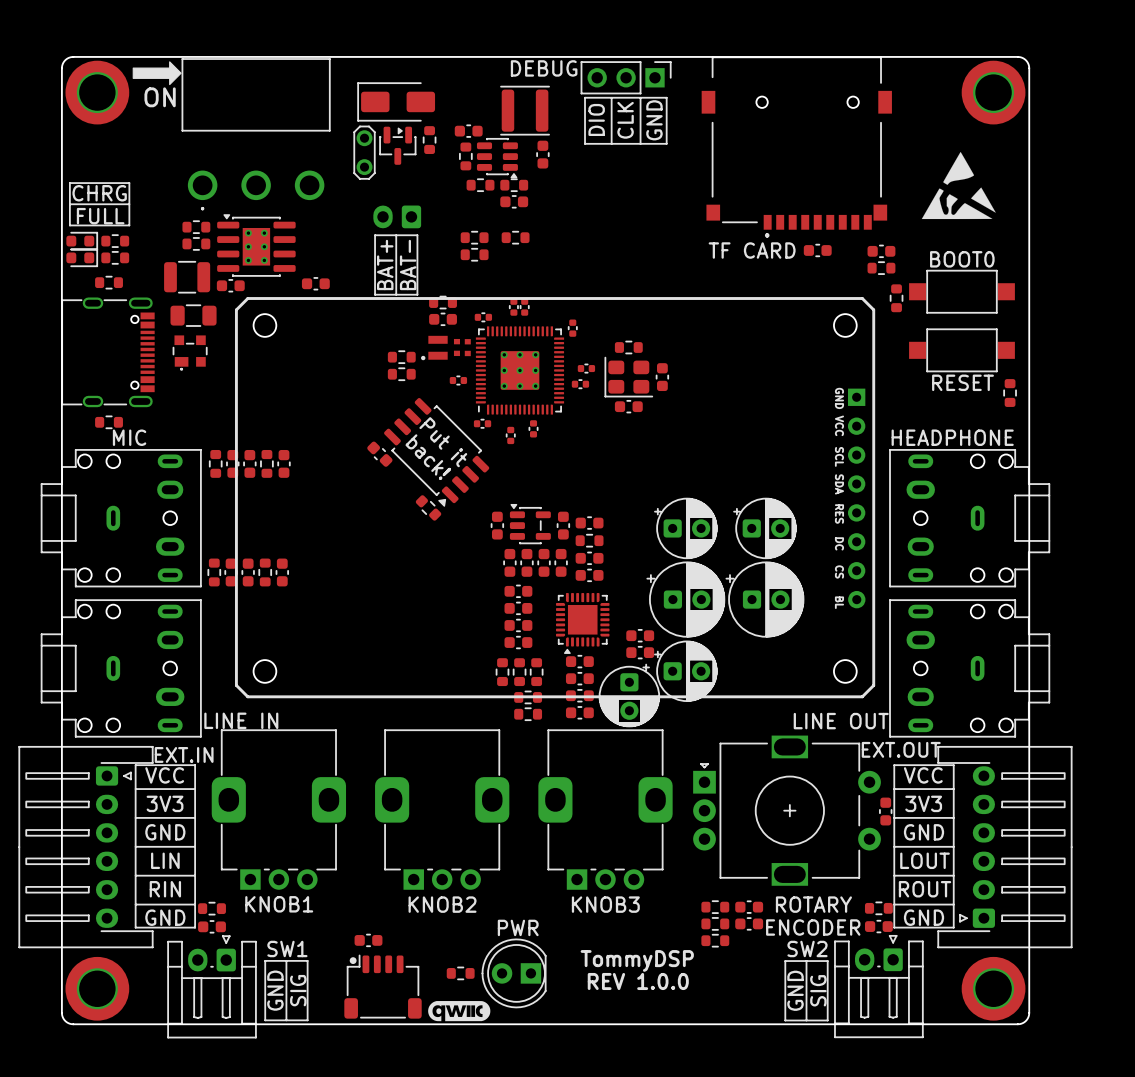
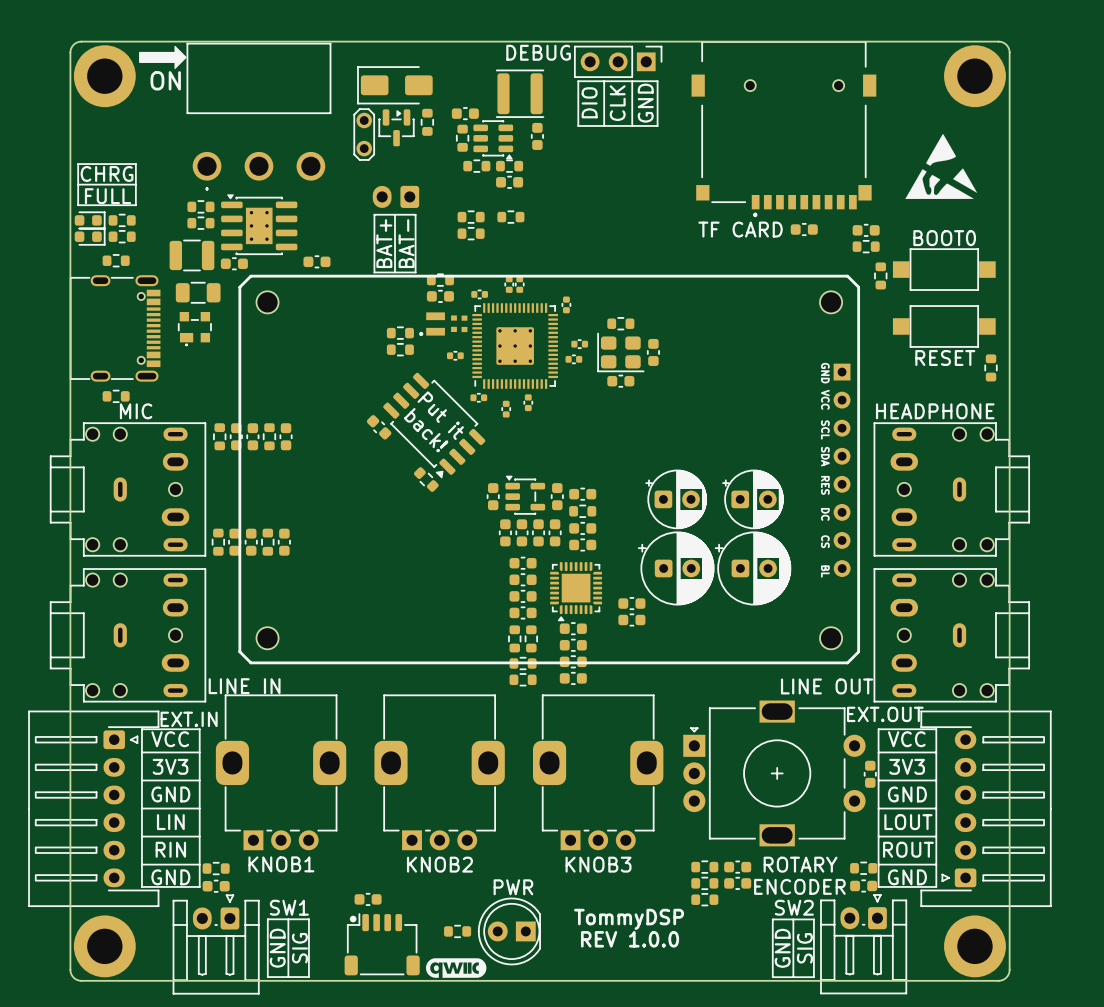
part: (518, 591) -> none
part: none -> (523, 563)
part: (518, 608) -> none
part: none -> (523, 579)
part: (518, 625) -> none
part: none -> (523, 596)
part: (518, 642) -> none
part: none -> (523, 612)
part: (685, 671) -> none
part: (502, 672) -> none
part: (629, 695) -> none

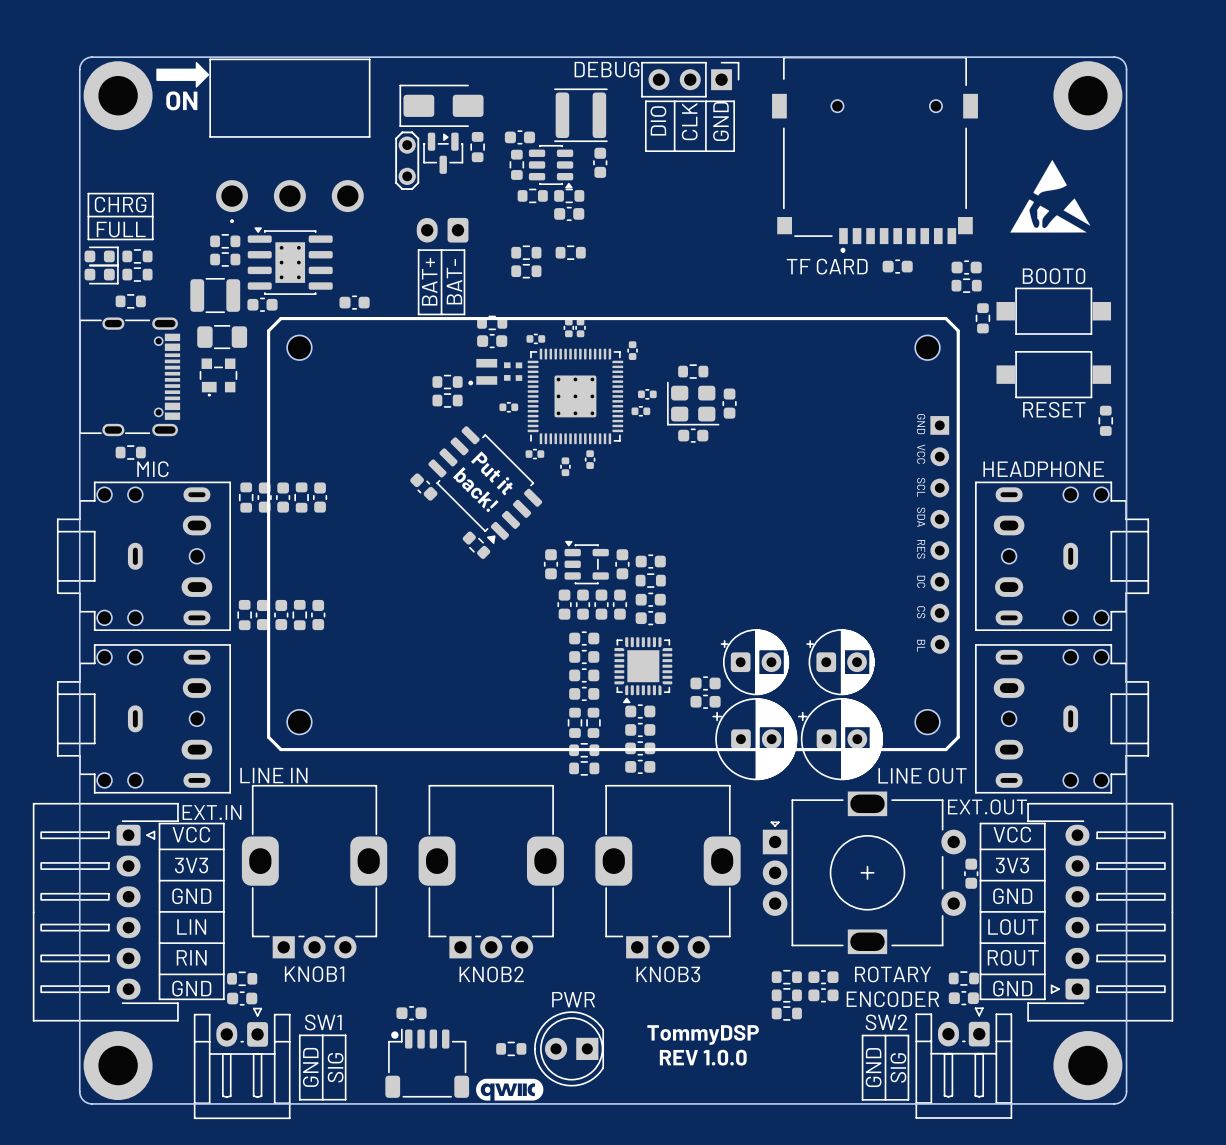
part: (676, 499) -> none
part: (752, 499) -> none
part: (676, 568) -> none
part: (752, 568) -> none
part: none -> (754, 662)
part: none -> (840, 662)
part: none -> (754, 739)
part: none -> (840, 739)

